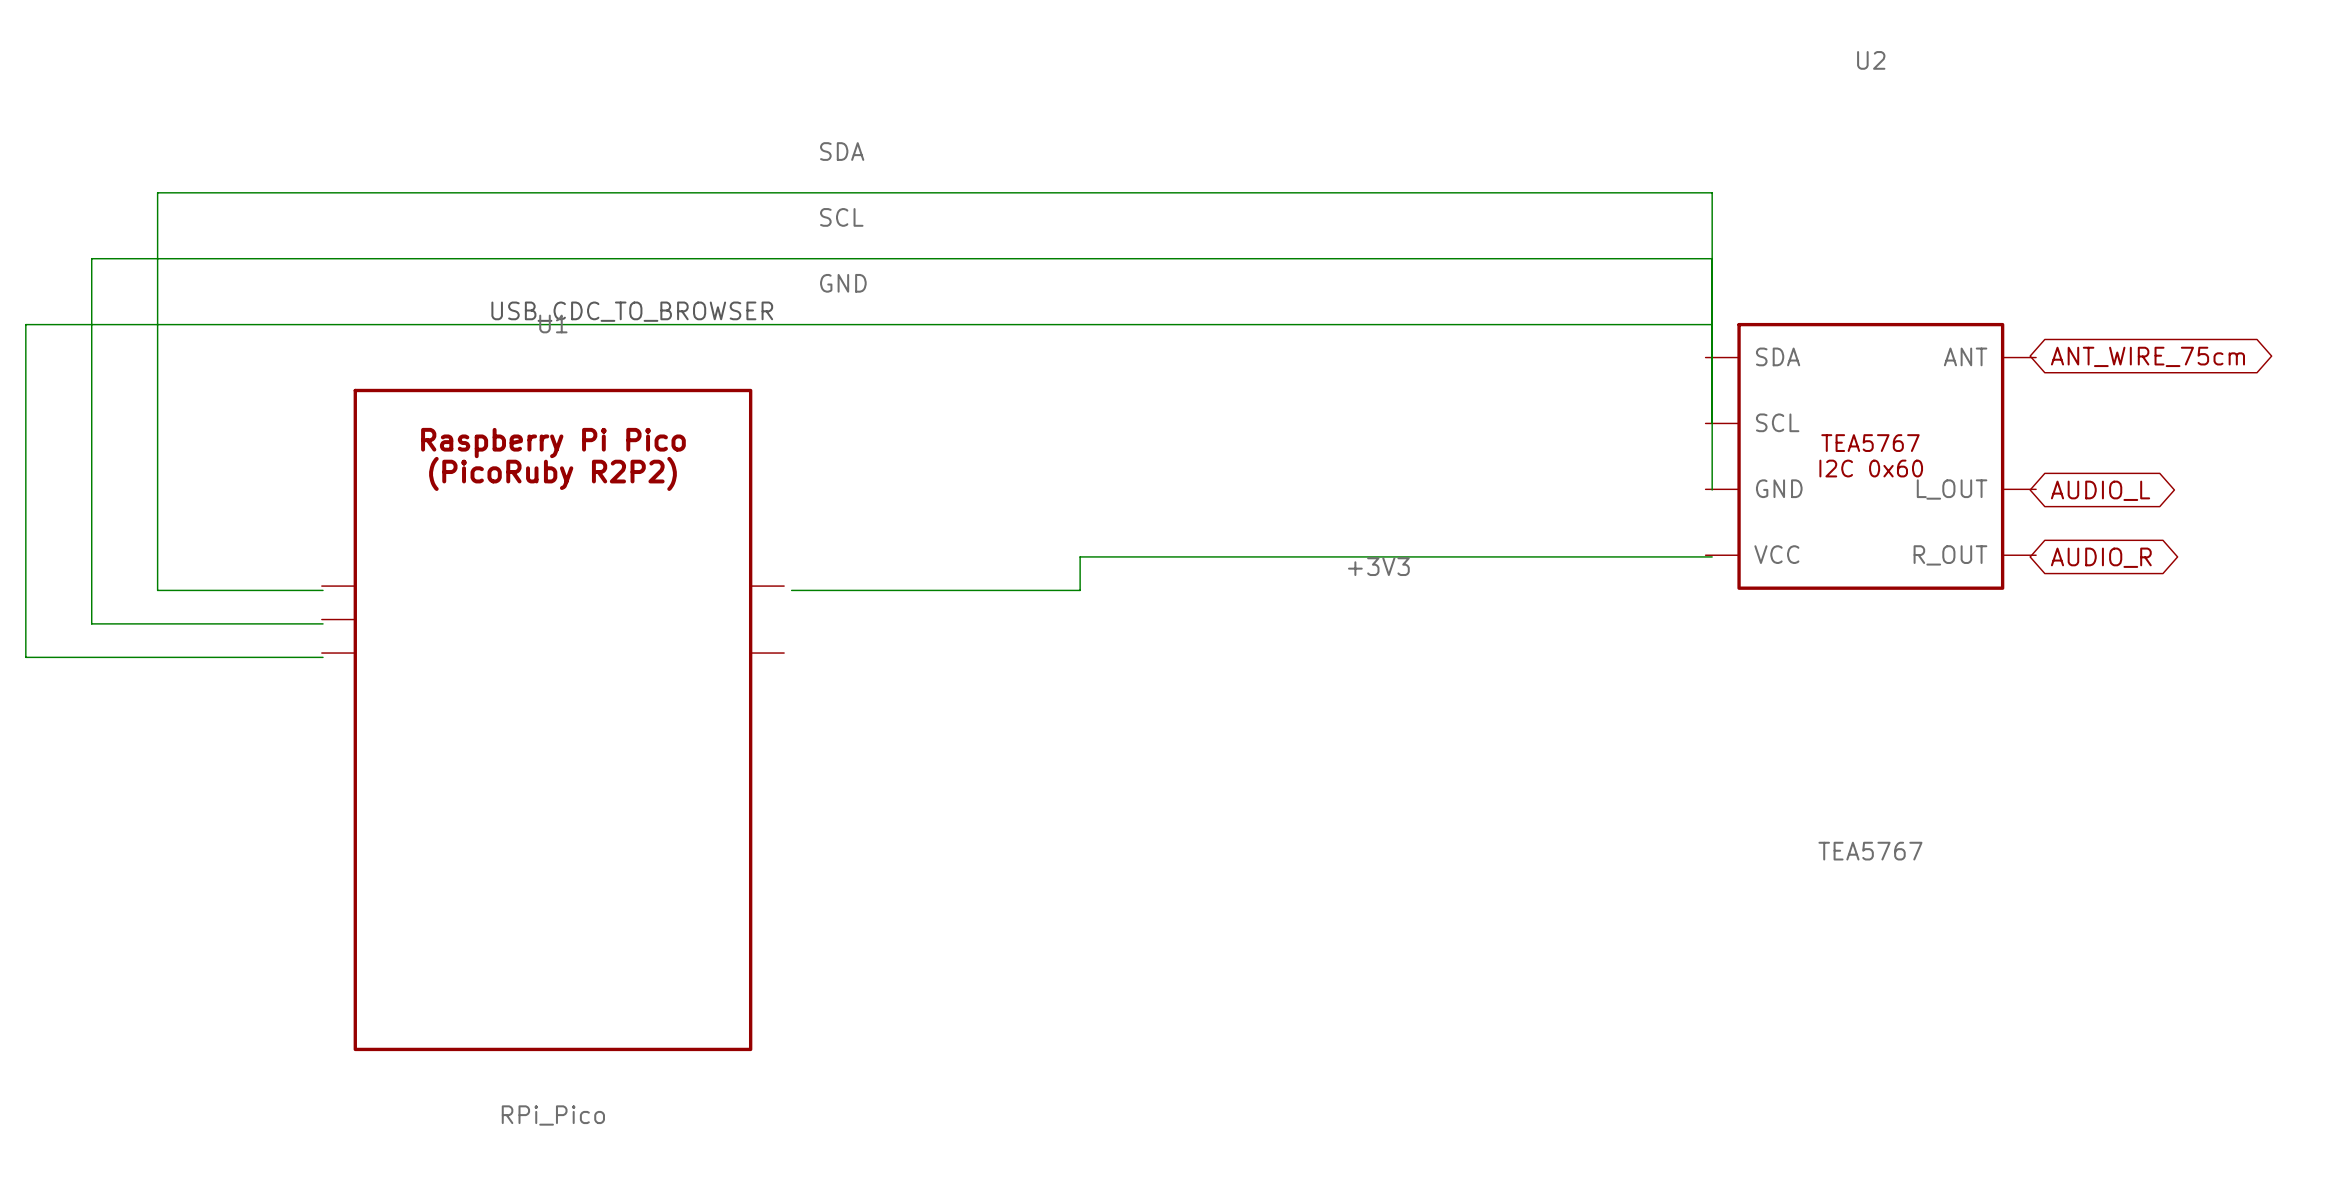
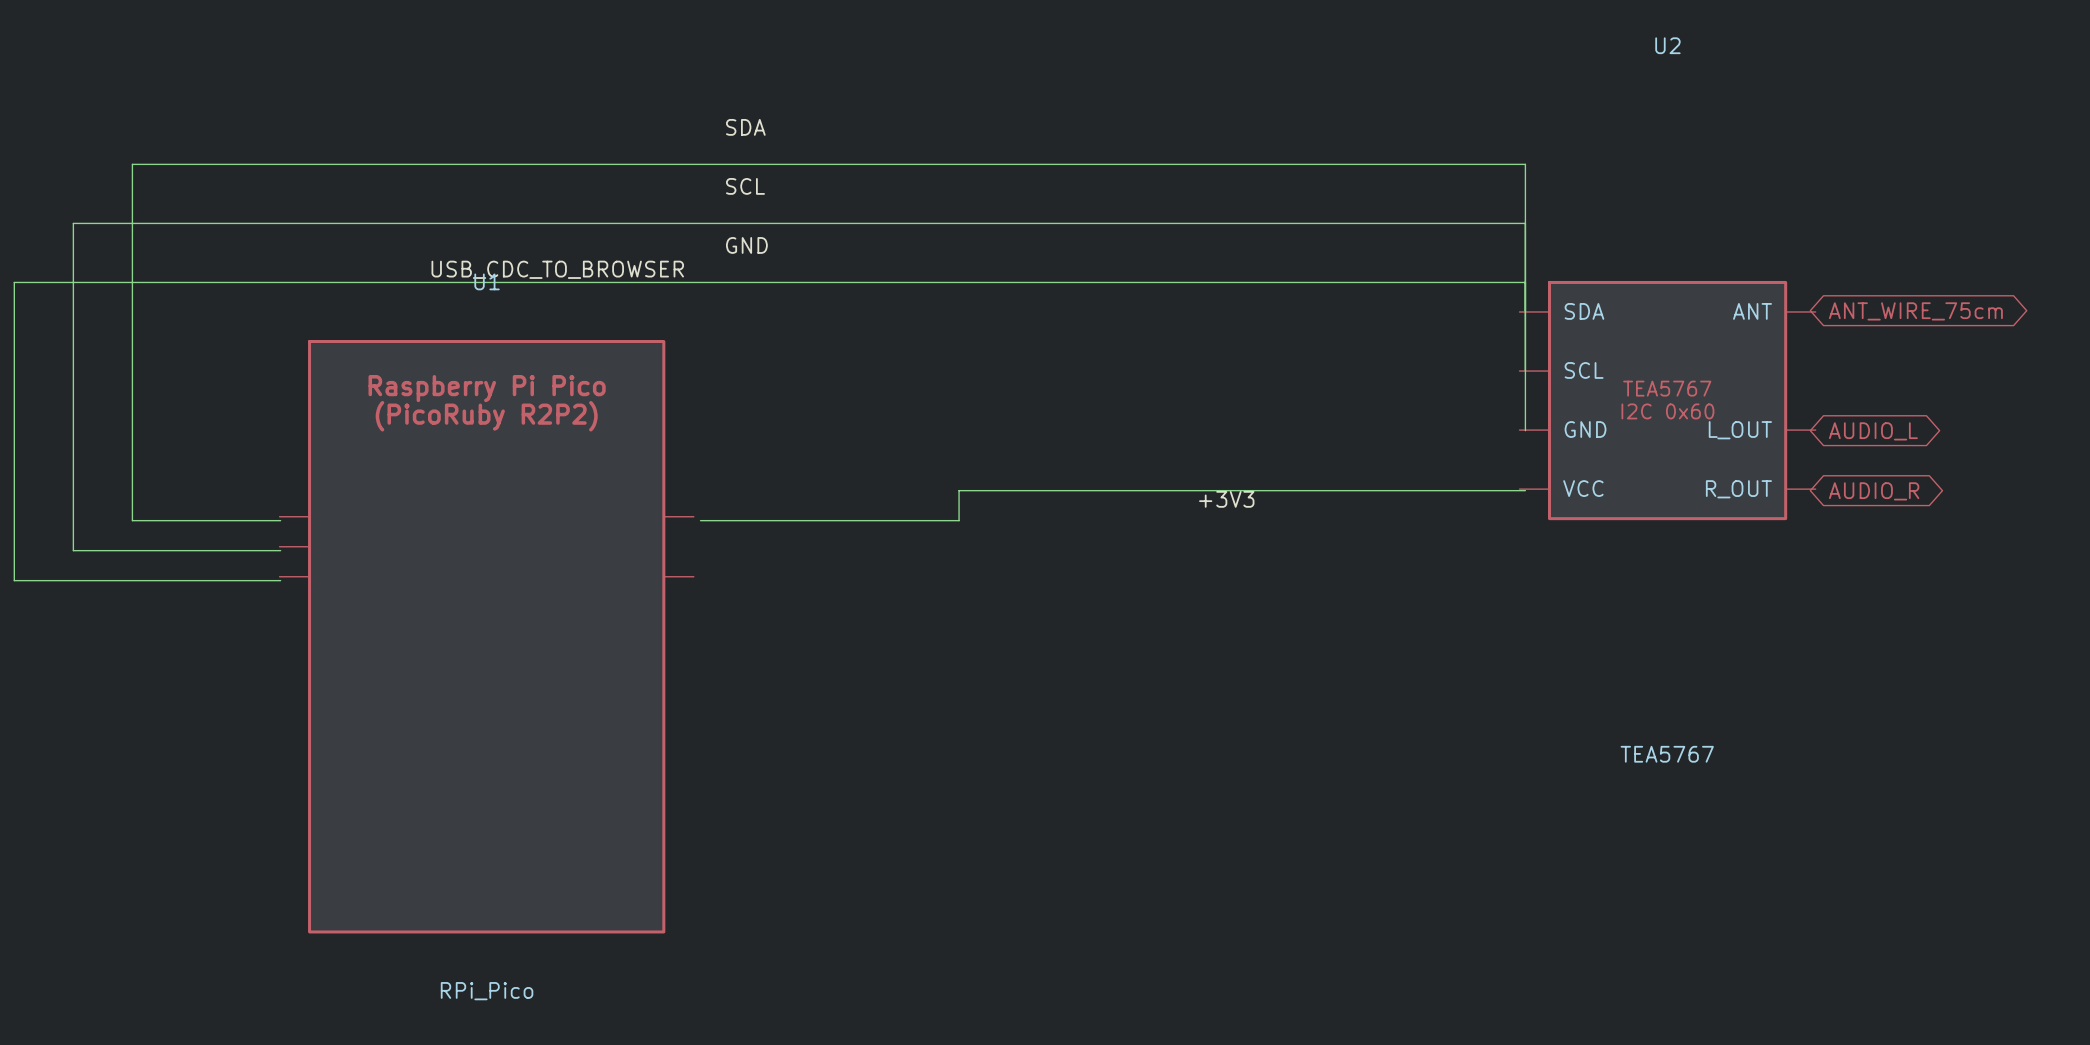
label: none -> USB_CDC_TO_BROWSER (557, 269)
text: USB_CDC_TO_BROWSER (632, 311) -> none

